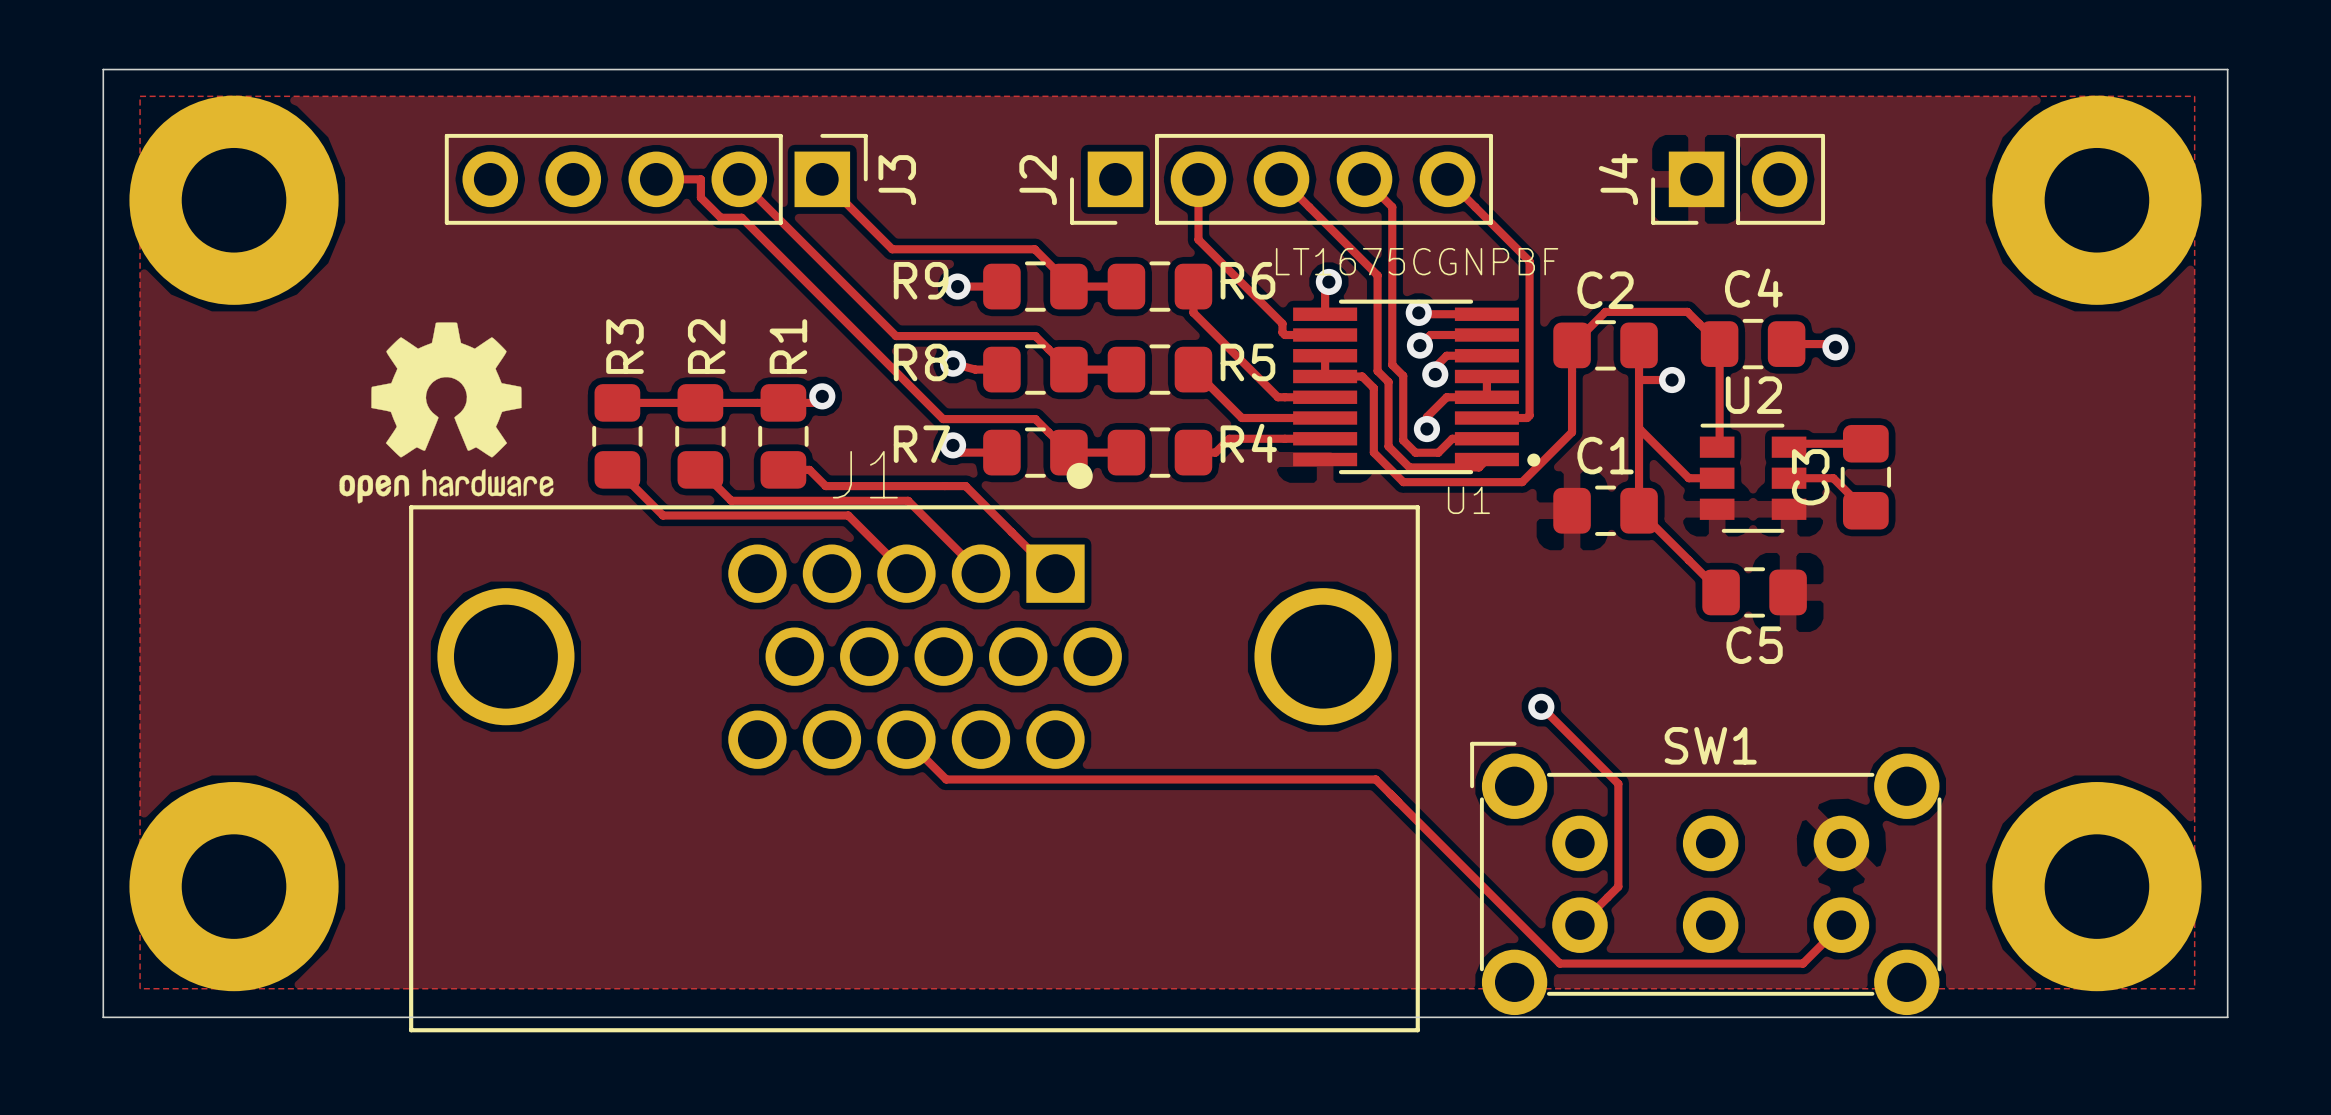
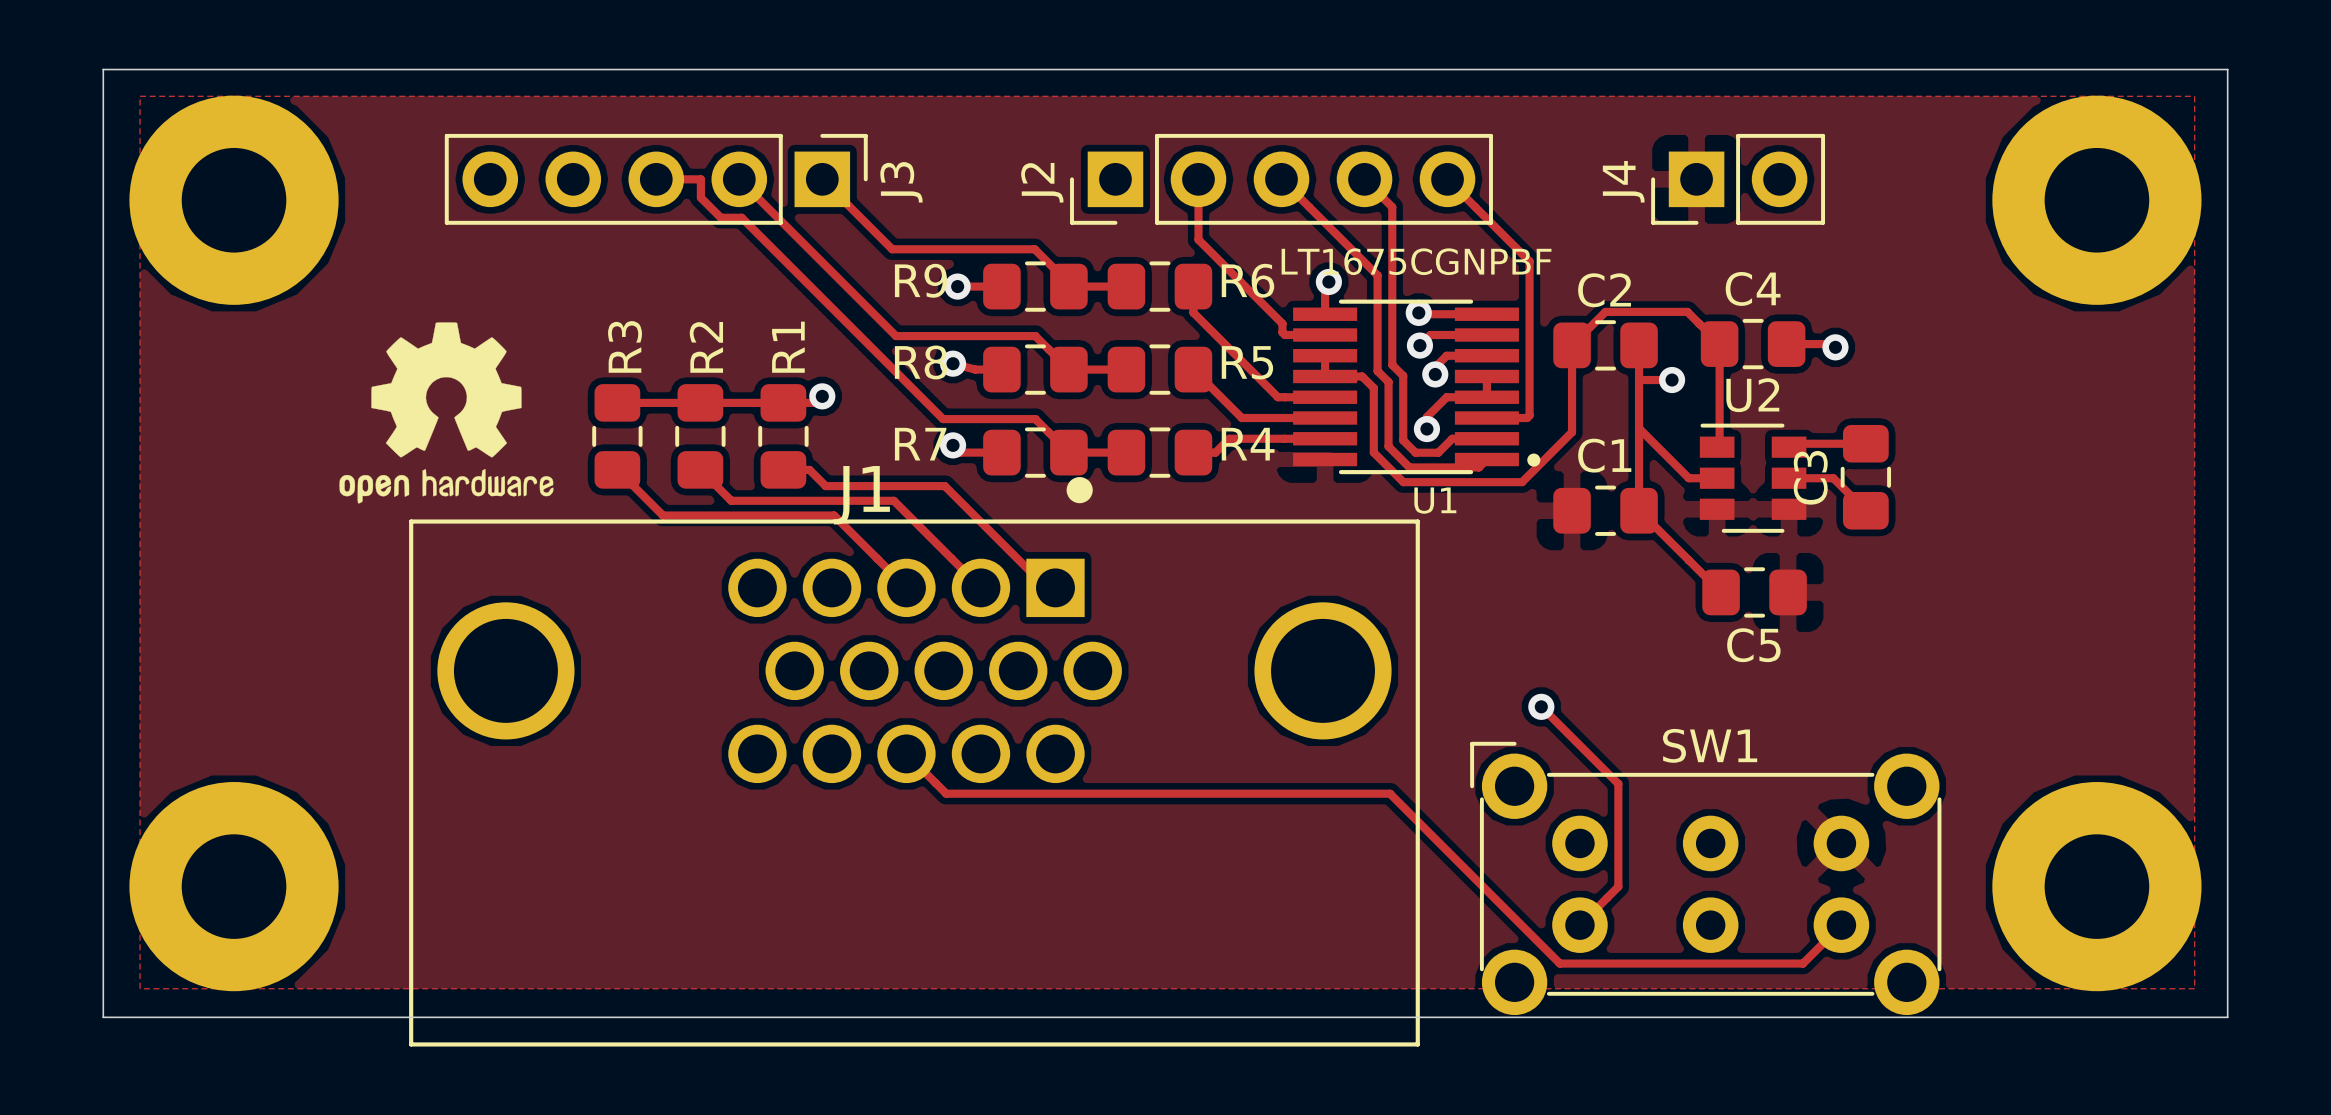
track: (944, 486) (965, 486) (1032, 552) -> (944, 486) (1046, 587)
track: (893, 500) (908, 500) (980, 573) -> (893, 500) (980, 587)
U1 name position: U1 (1468, 500) -> U1 (1435, 500)
track: (834, 515) (848, 515) (906, 573) -> (834, 515) (906, 587)
track: (906, 739) (946, 779) (1375, 779) (1390, 793) -> (906, 753) (946, 793) (1390, 793)
J1 position: (914, 747) -> (914, 761)

